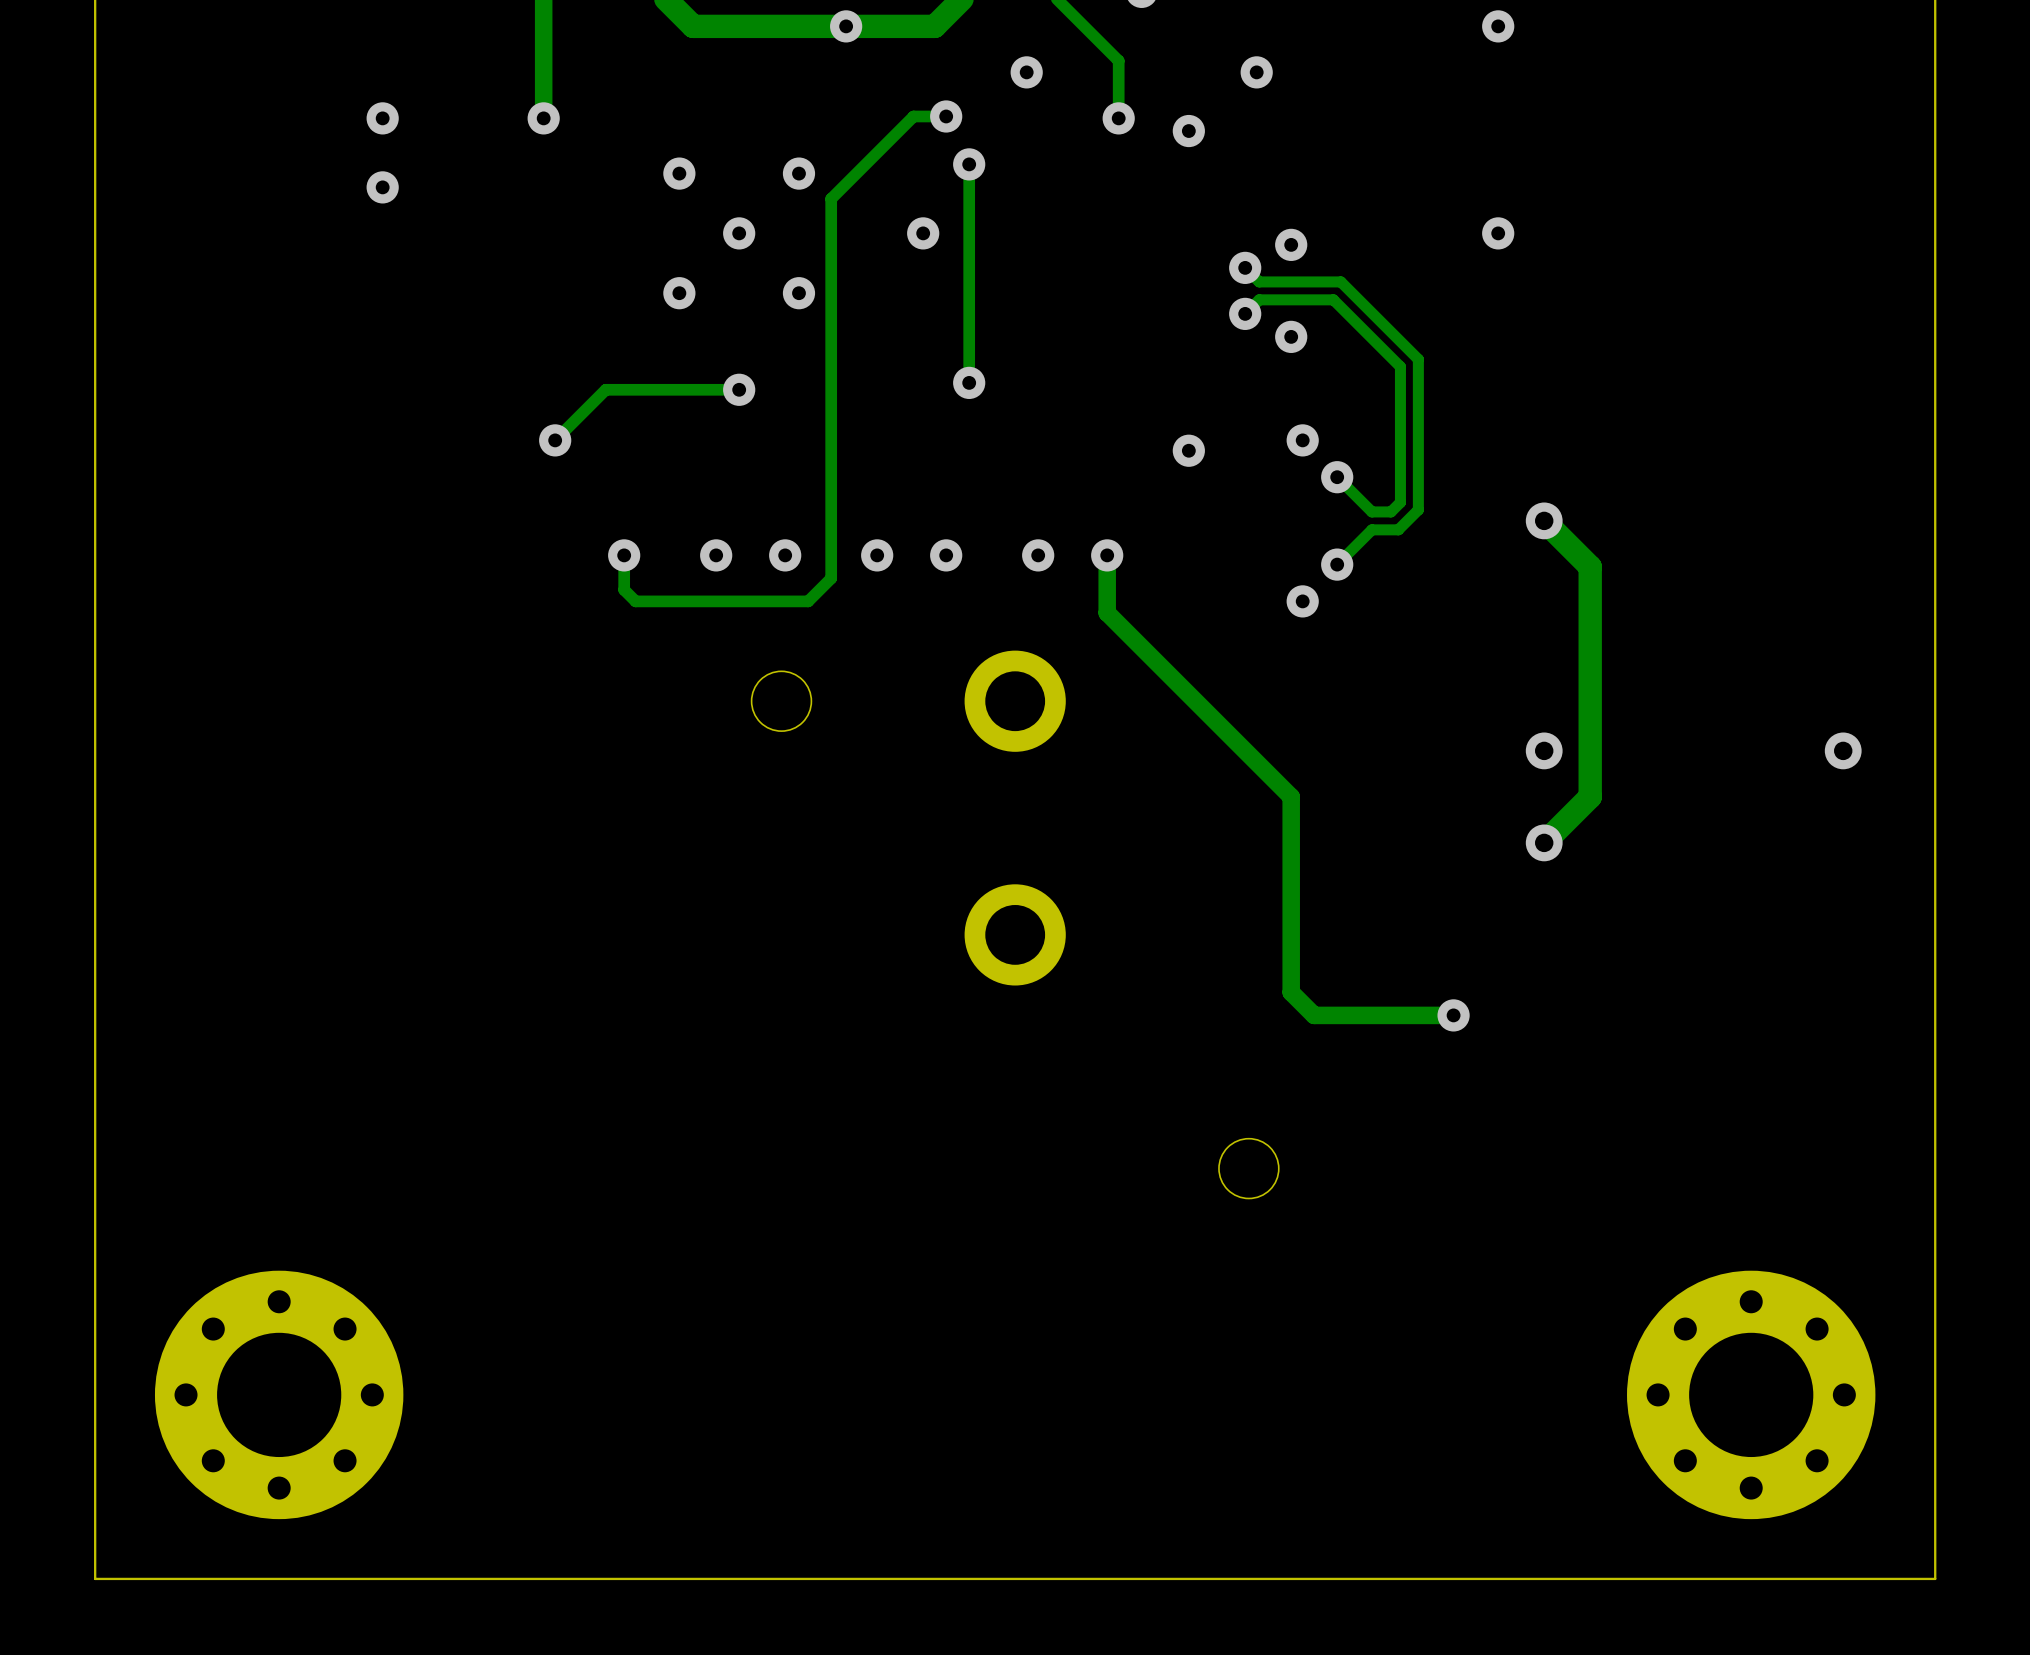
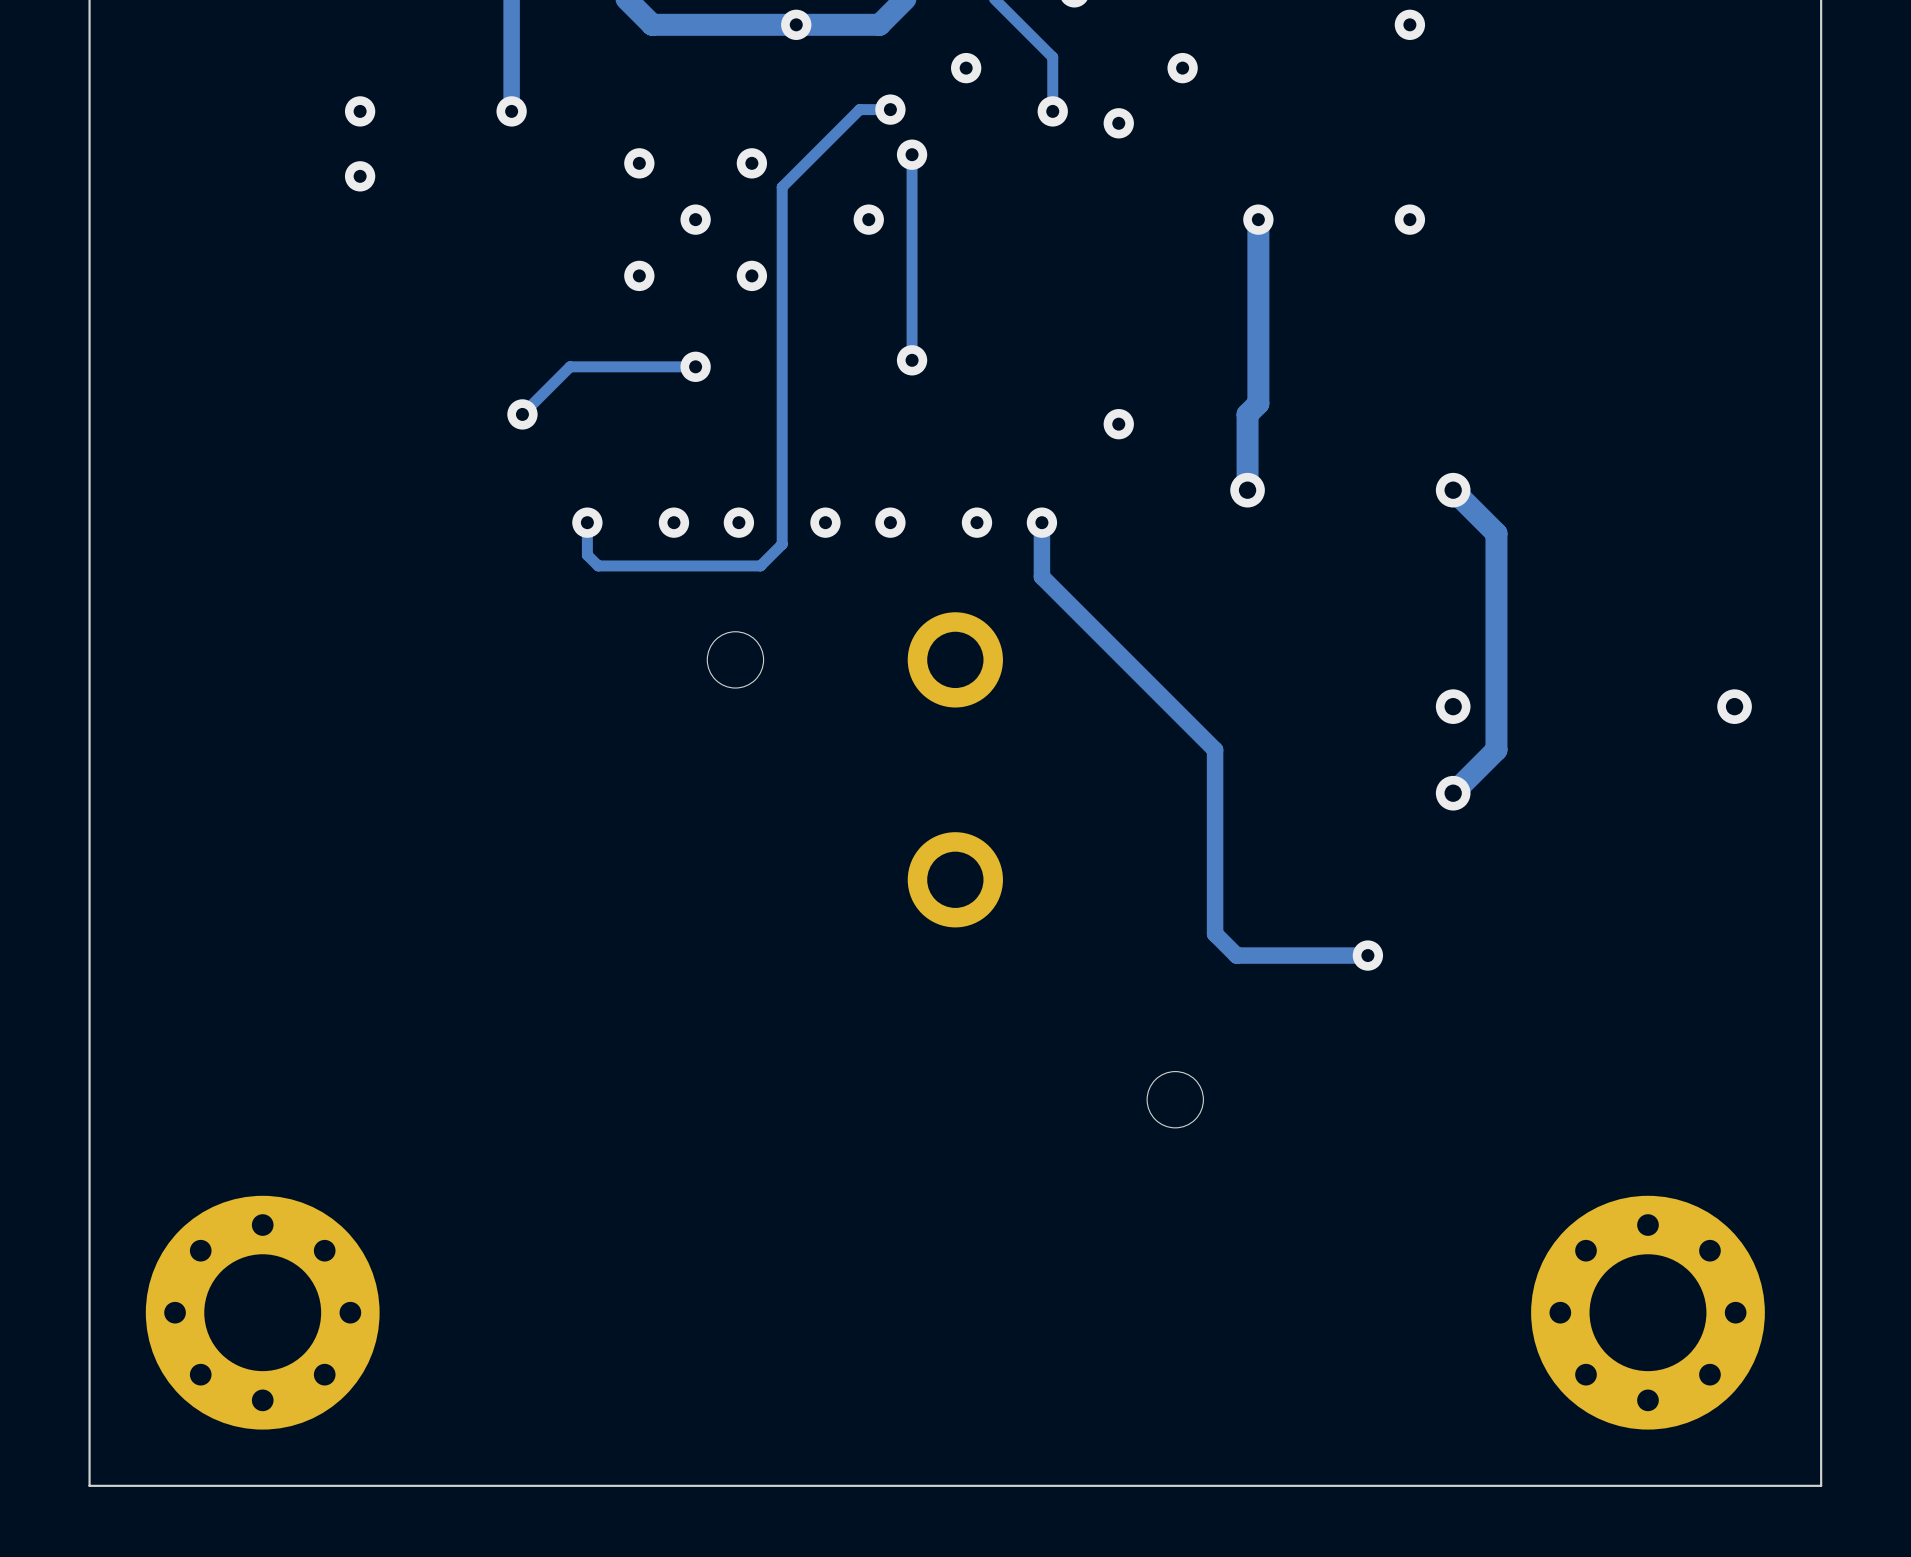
track: none -> (1258, 219) (1258, 403) (1247, 414) (1247, 490)
via position: (1291, 244) -> (1258, 219)
track: (1245, 267) (1259, 281) (1340, 281) (1418, 359) (1418, 509) (1398, 529) (1371, 529) (1337, 564) -> none
via: (1245, 267) -> none
track: (1245, 313) (1259, 299) (1333, 299) (1400, 366) (1400, 502) (1390, 511) (1371, 511) (1337, 477) -> none
via: (1245, 313) -> none
via: (1291, 336) -> none
via: (1302, 440) -> none
via: (1337, 477) -> none
via: none -> (1247, 490)
via: (1337, 564) -> none
via: (1302, 601) -> none

